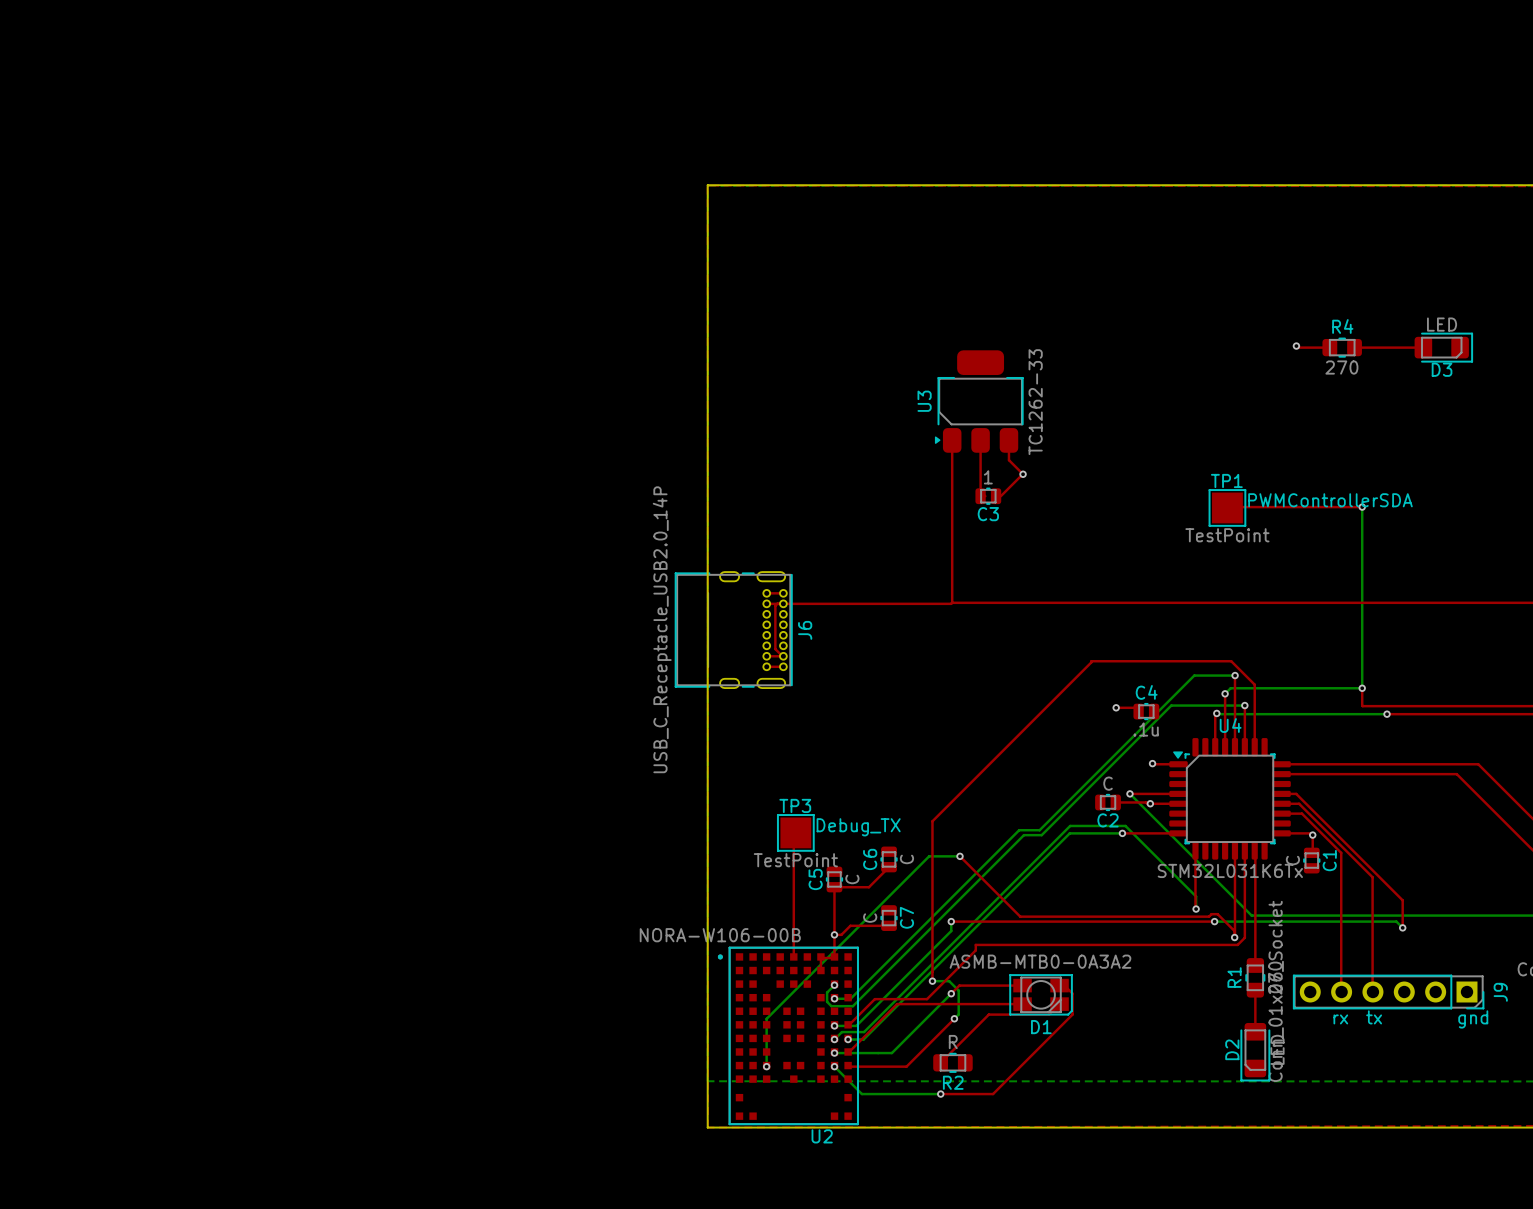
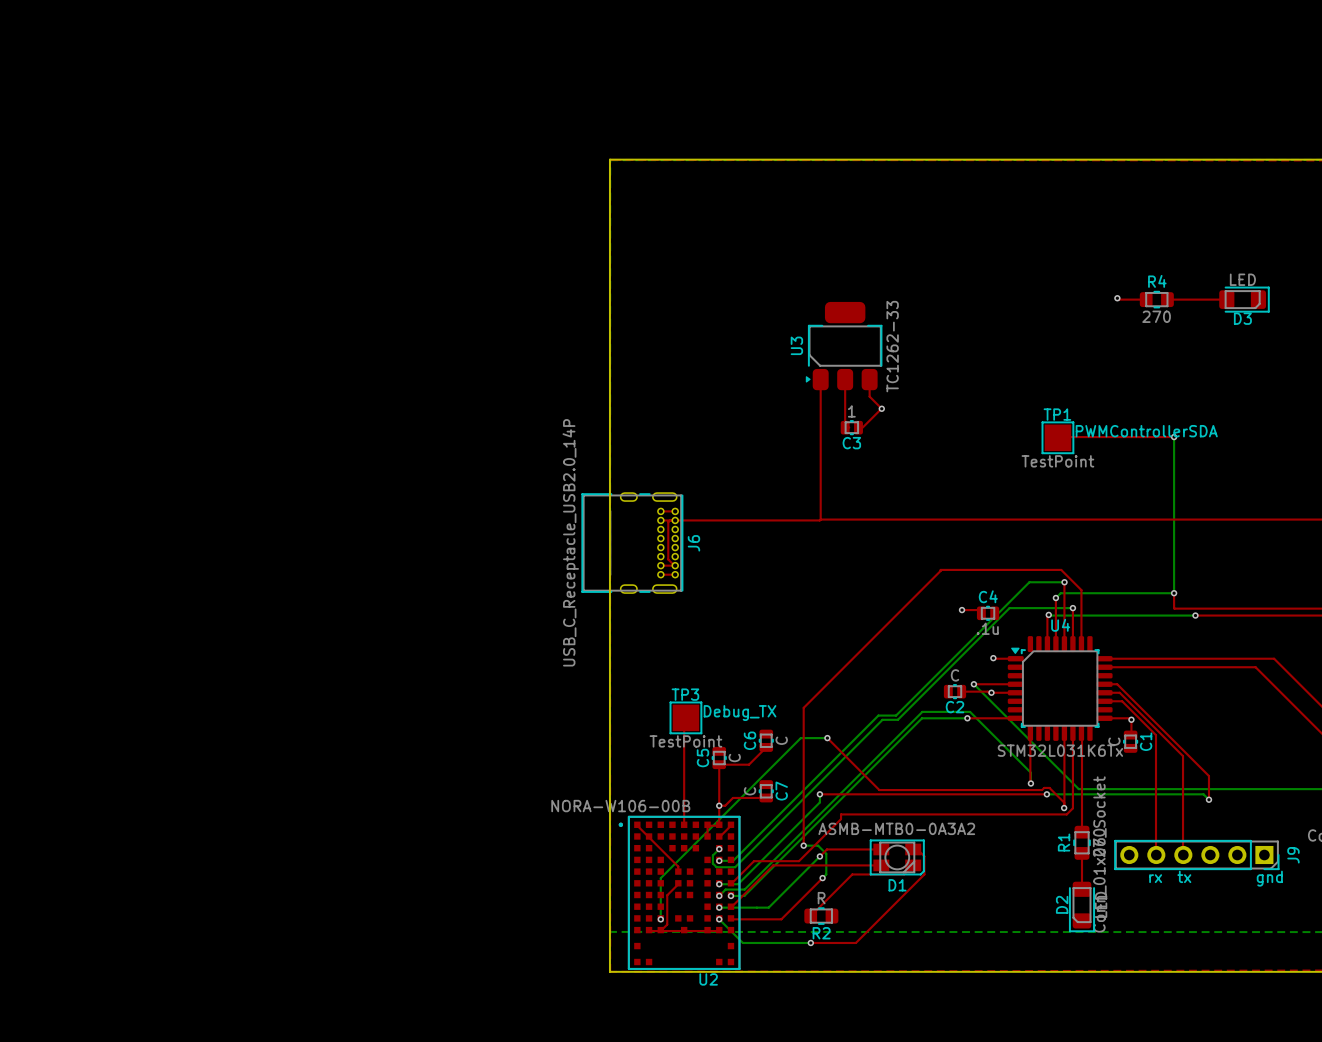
top track: none -> (637, 825) (678, 866) (678, 872)
top track: none -> (730, 825) (719, 837)
top track: none -> (678, 884) (667, 895) (667, 924) (660, 931)
top track: none -> (649, 931) (719, 931)

